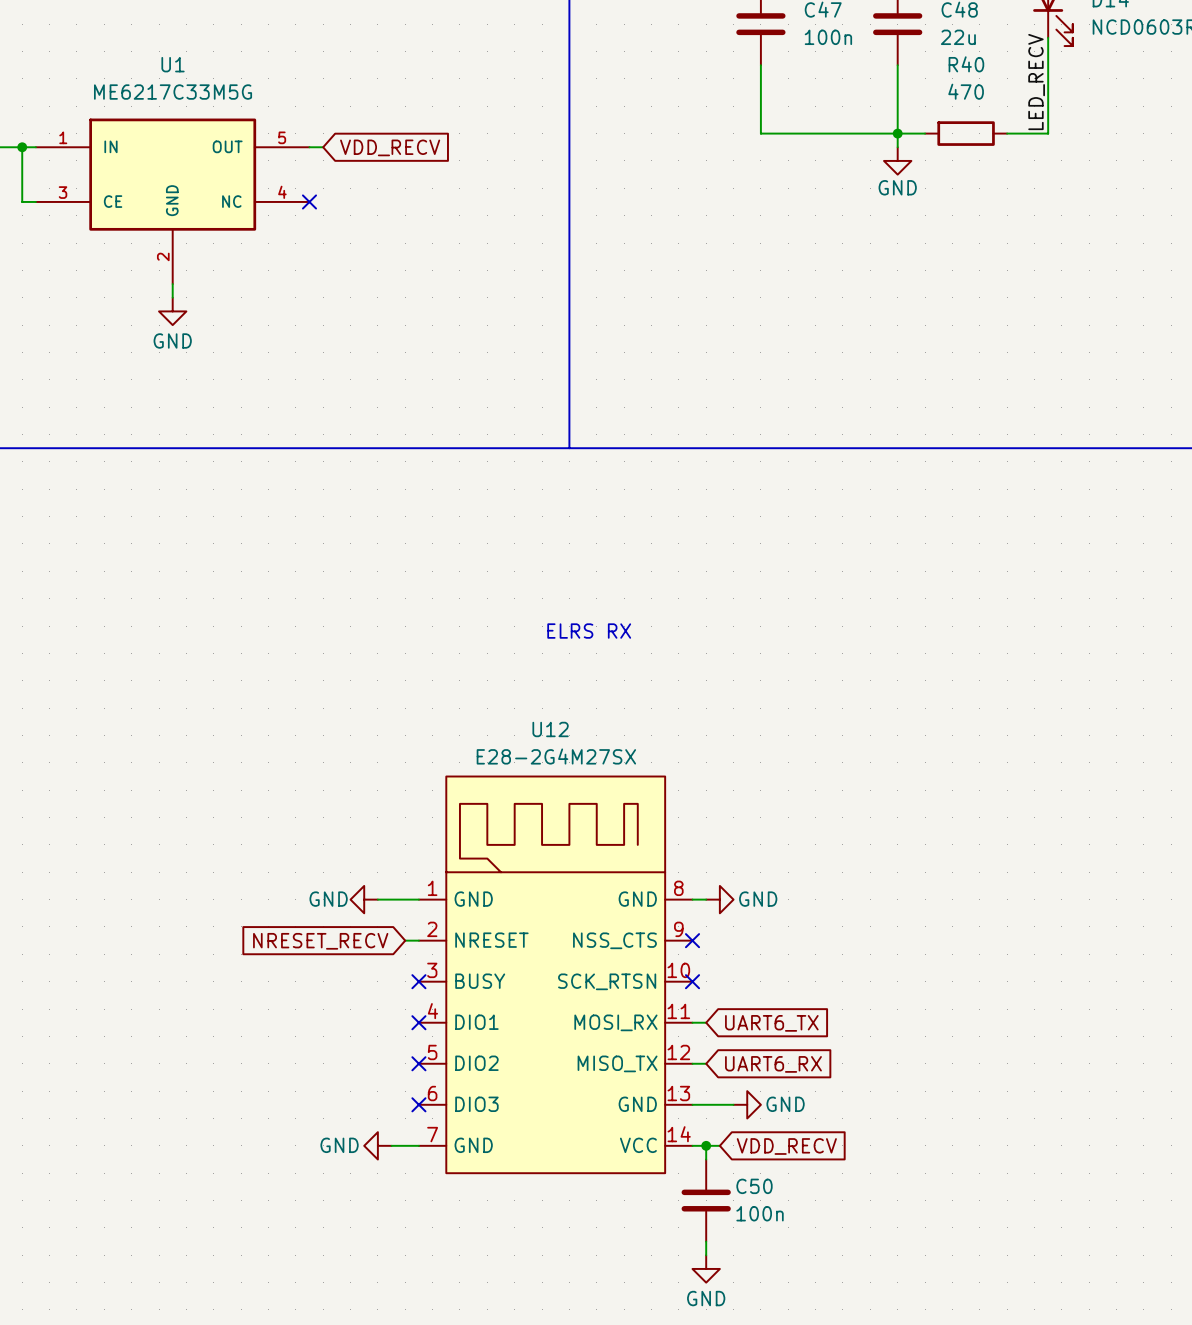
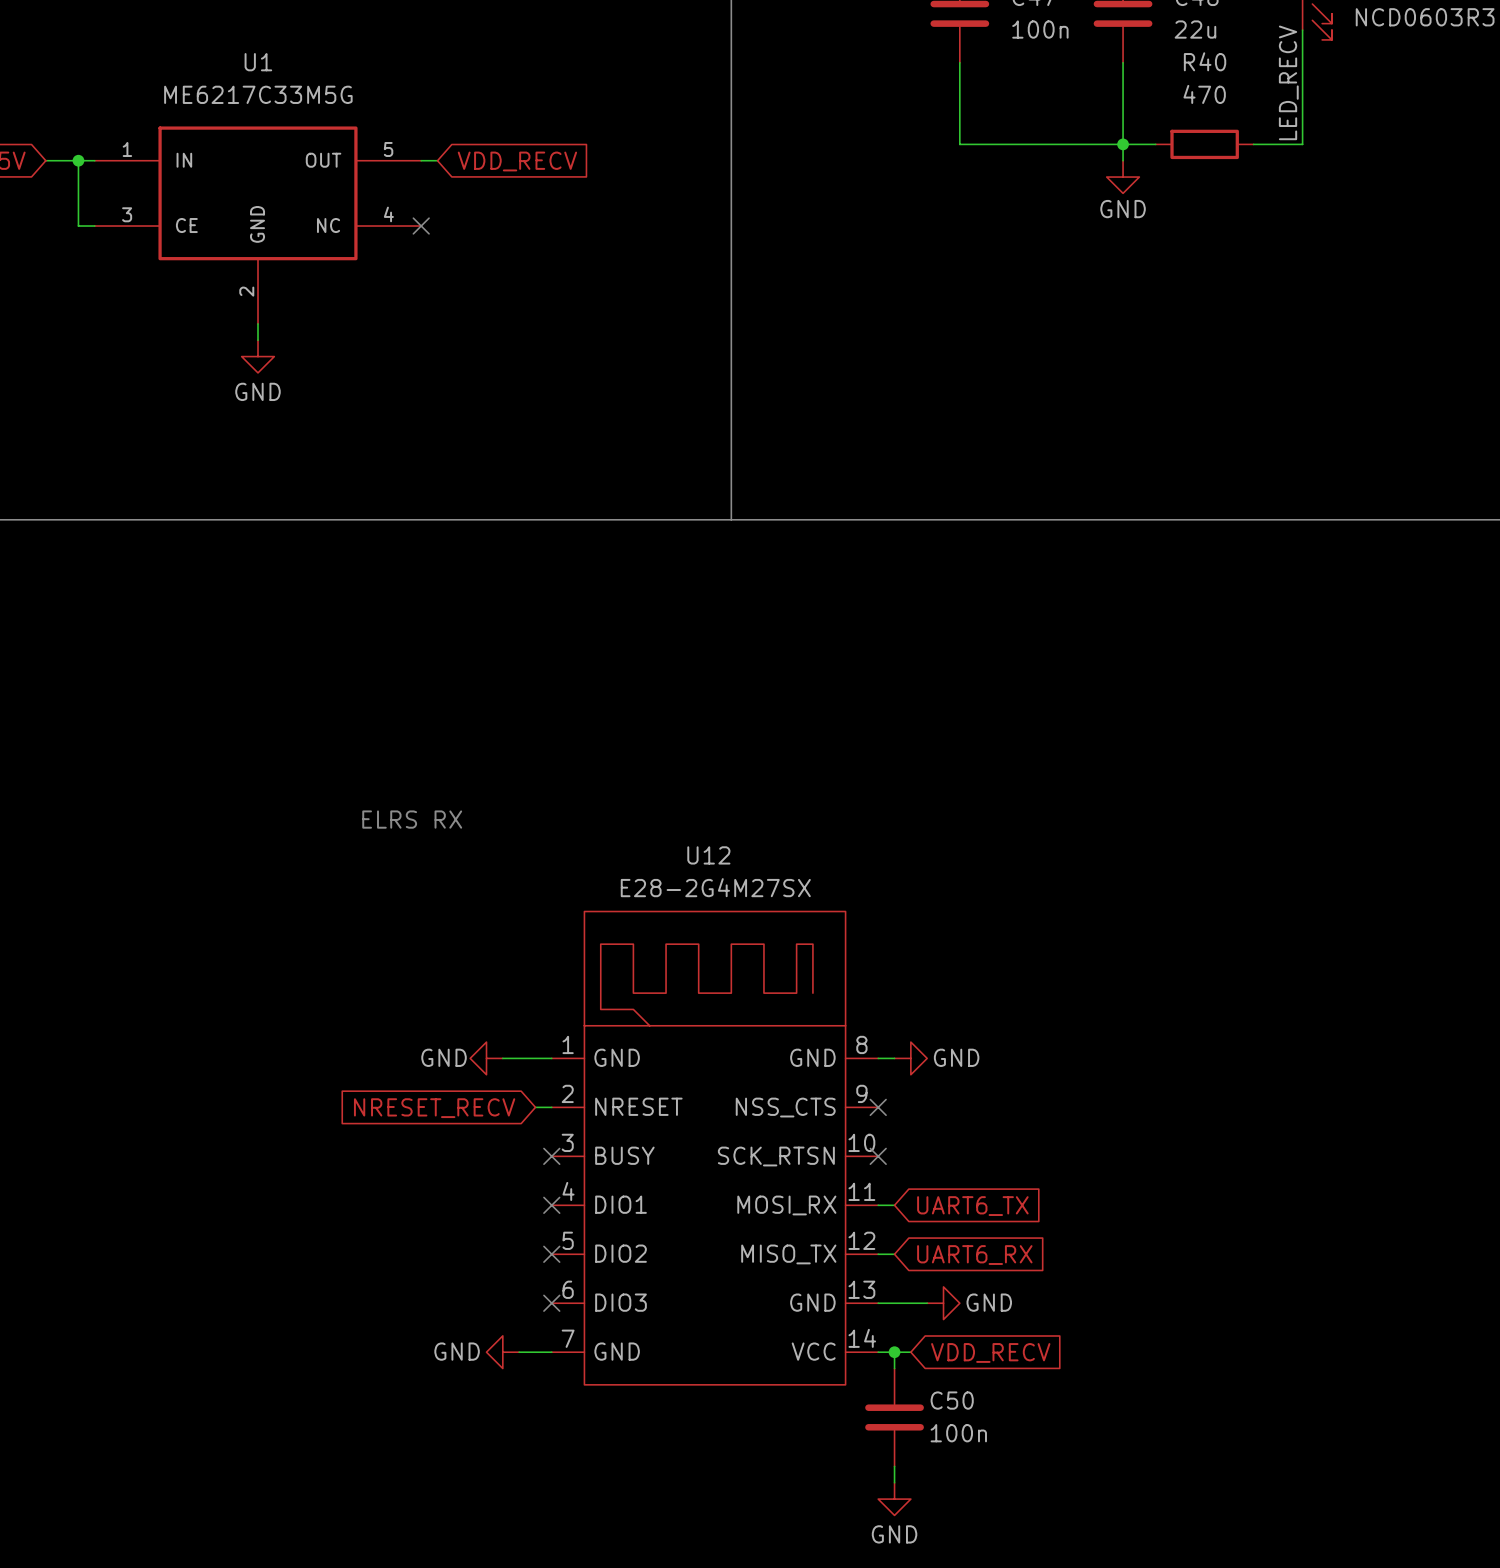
text: ELRS RX (589, 631) -> none
text: none -> ELRS RX (412, 819)

